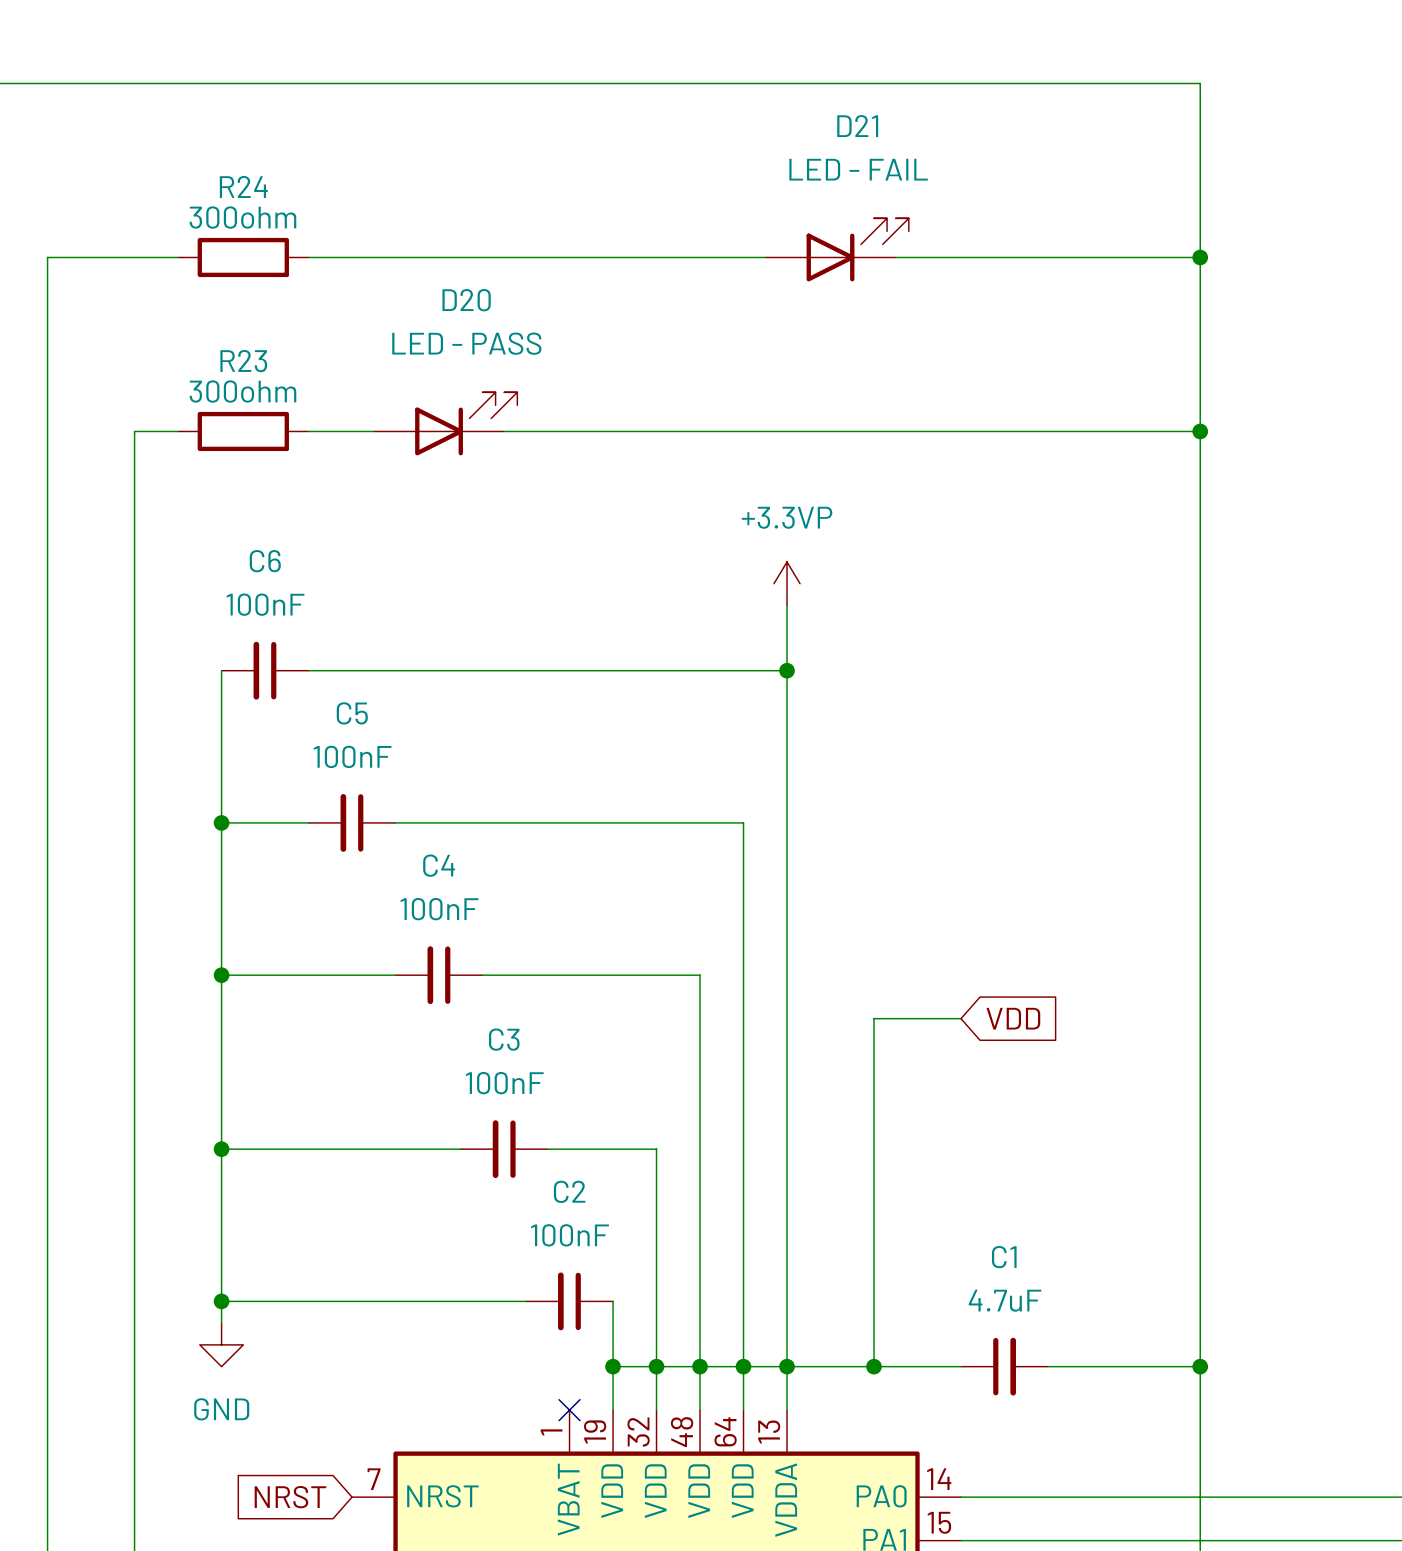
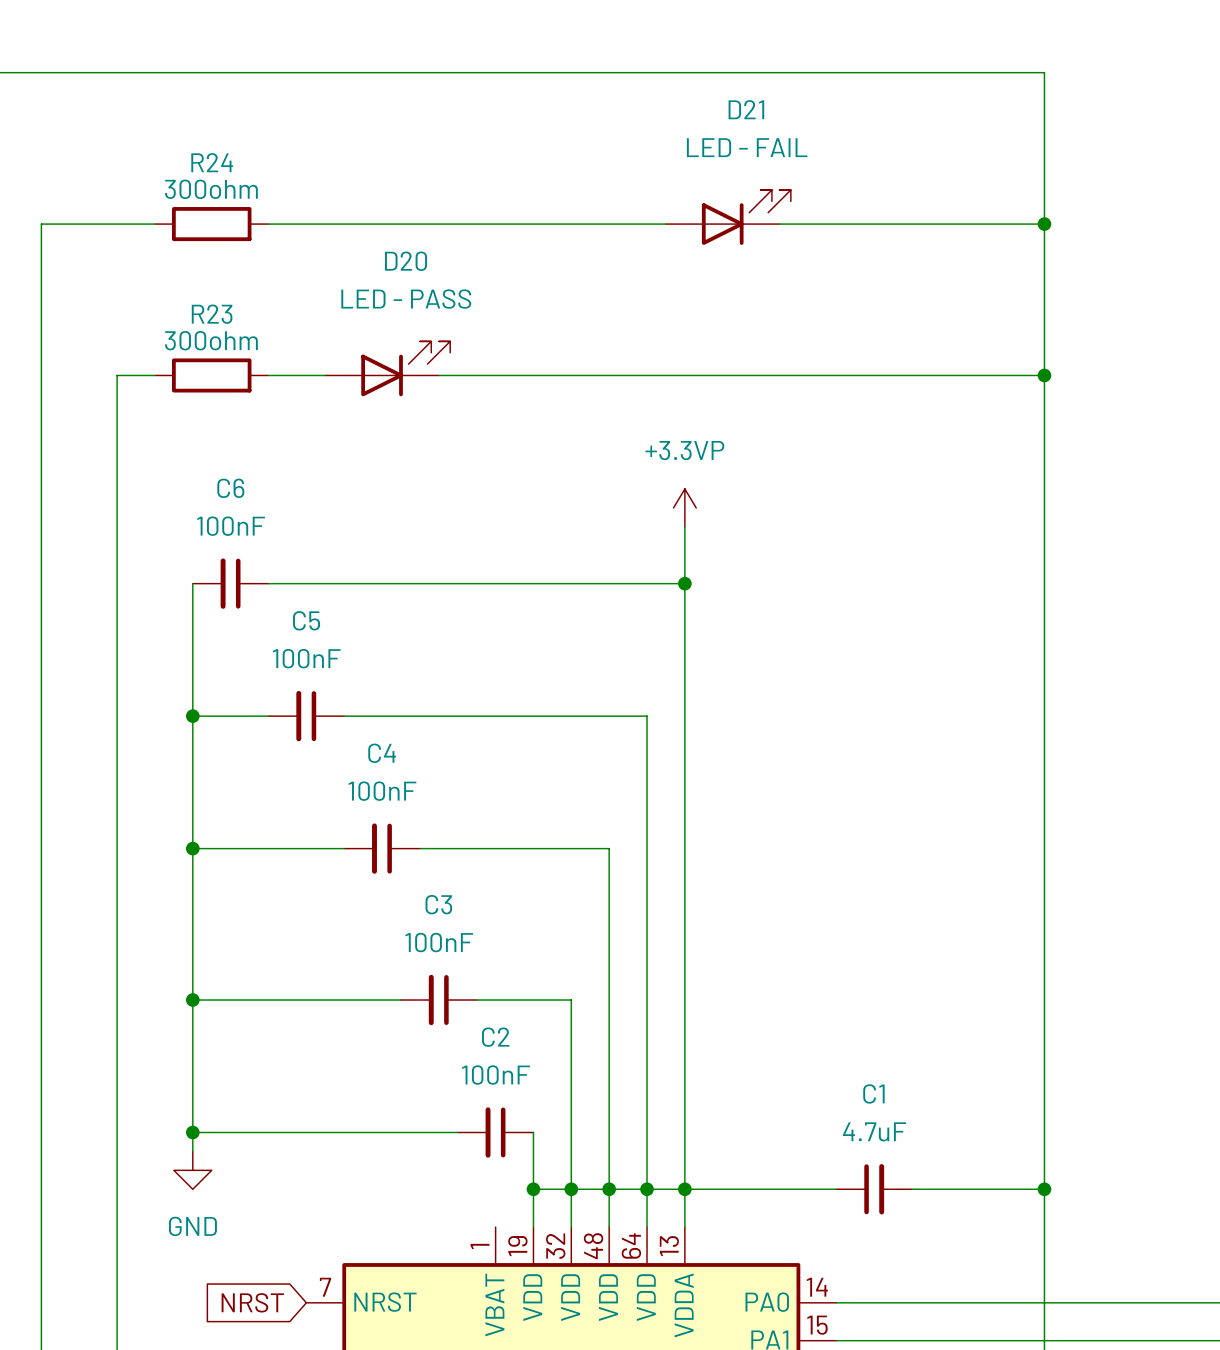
wire: (961, 1018) (874, 1018) (874, 1366) -> none
global label: VDD (1013, 1018) -> none
junction: (874, 1366) -> none
no-connect mark: (569, 1410) -> none

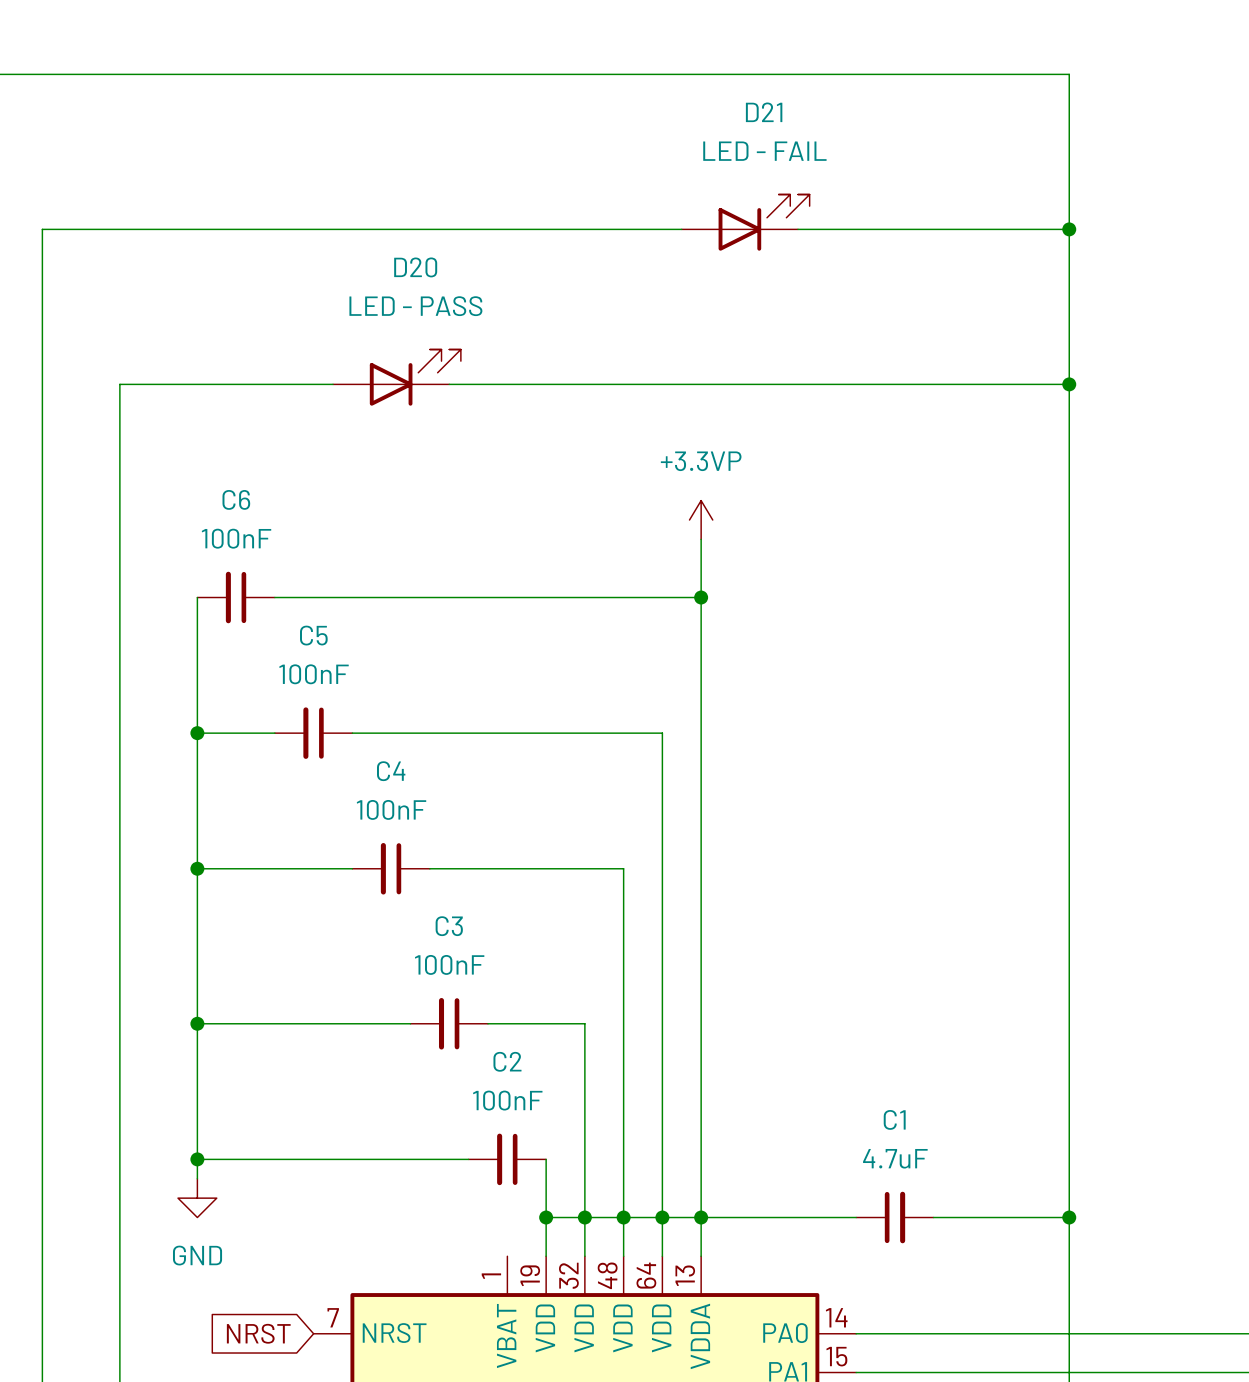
wire: none -> (158, 229) (274, 229)
R24: 300ohm (211, 224) -> none
wire: none -> (158, 384) (274, 384)
R23: 300ohm (211, 375) -> none

